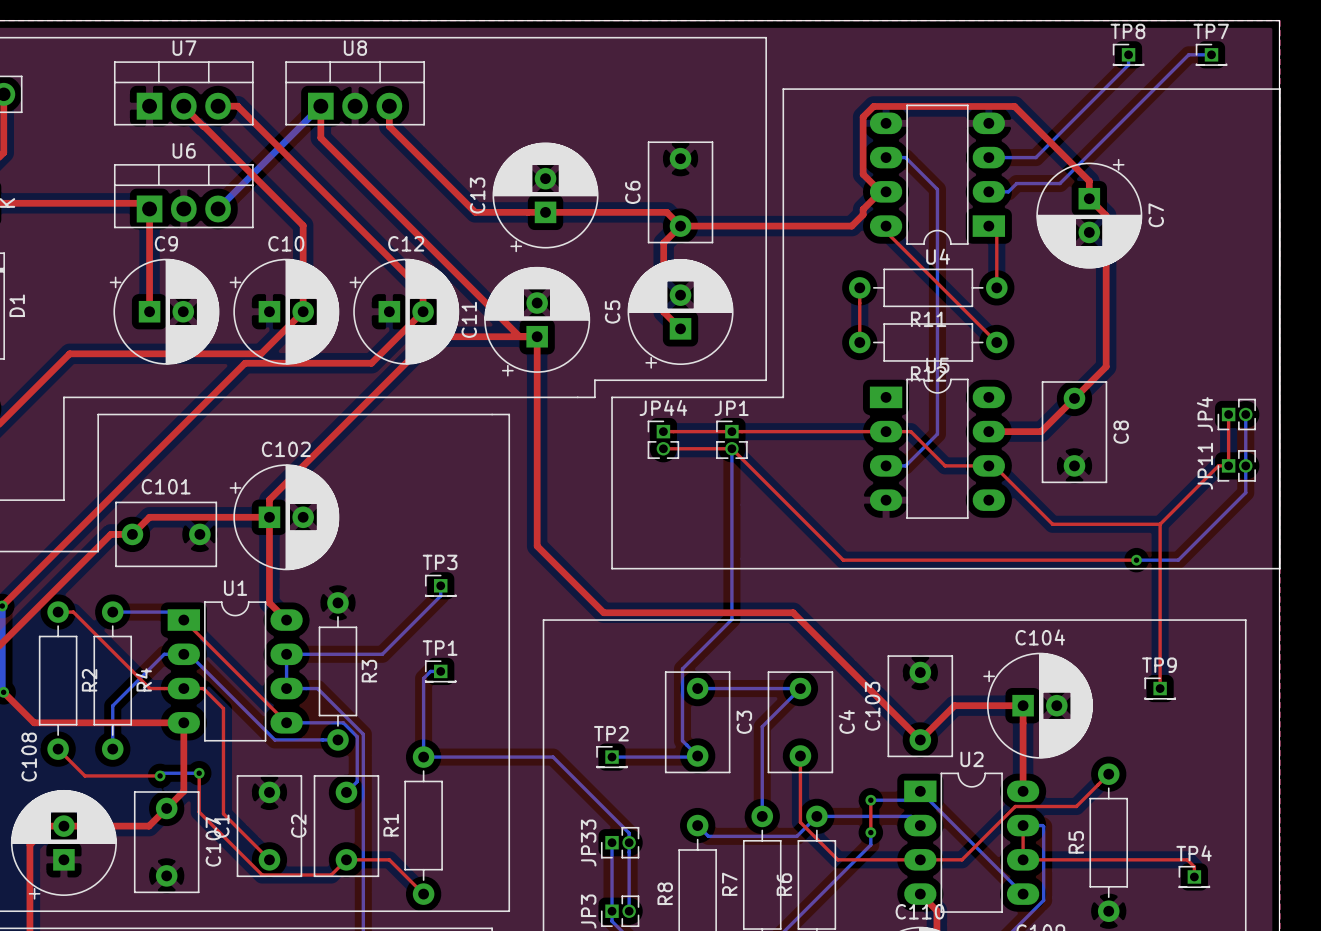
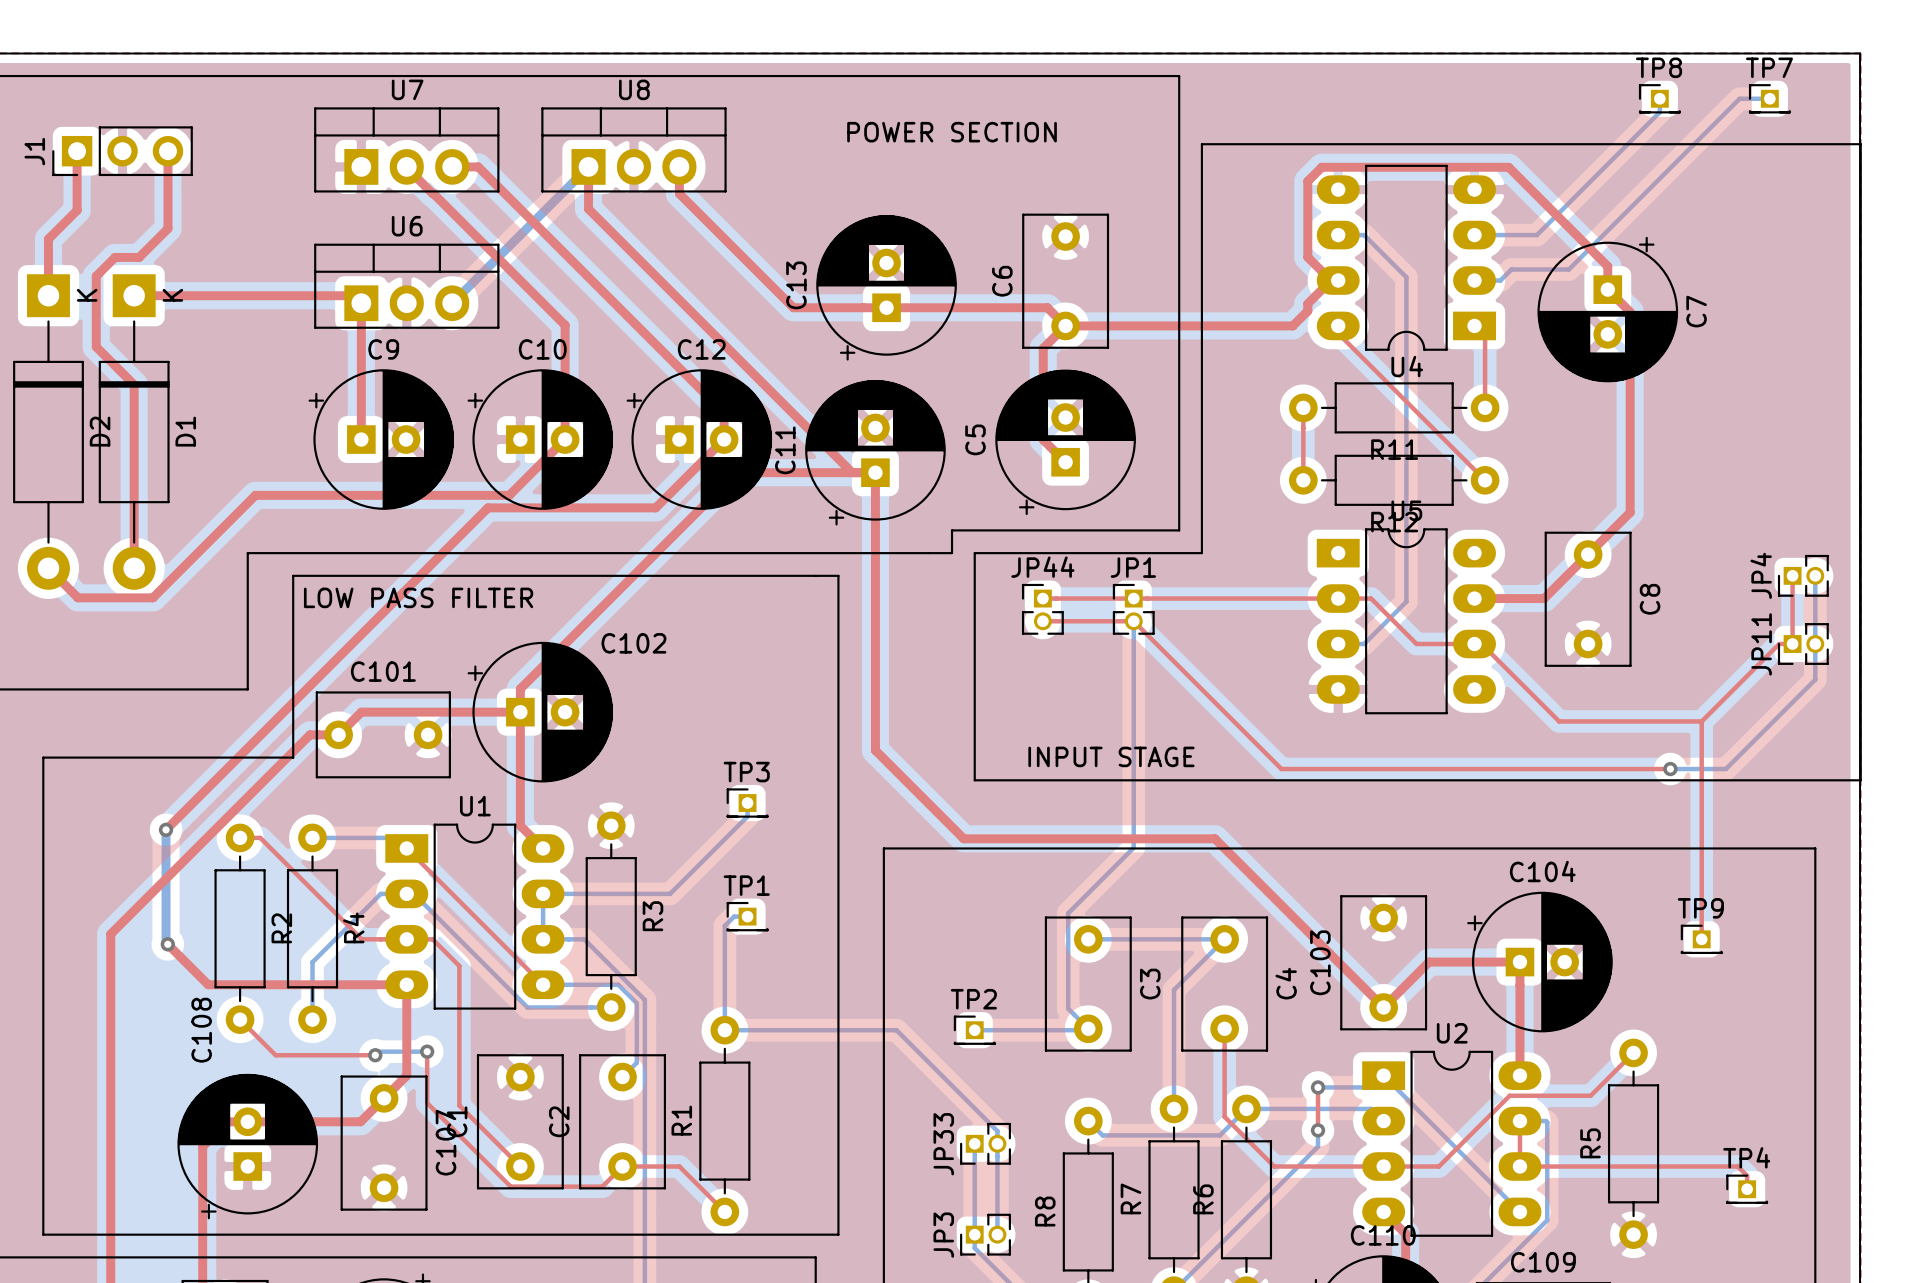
text: none -> POWER SECTION (952, 132)
text: none -> LOW PASS FILTER (418, 597)
C102 name position: C102 (286, 449) -> C102 (633, 643)
text: none -> INPUT STAGE (1111, 756)

